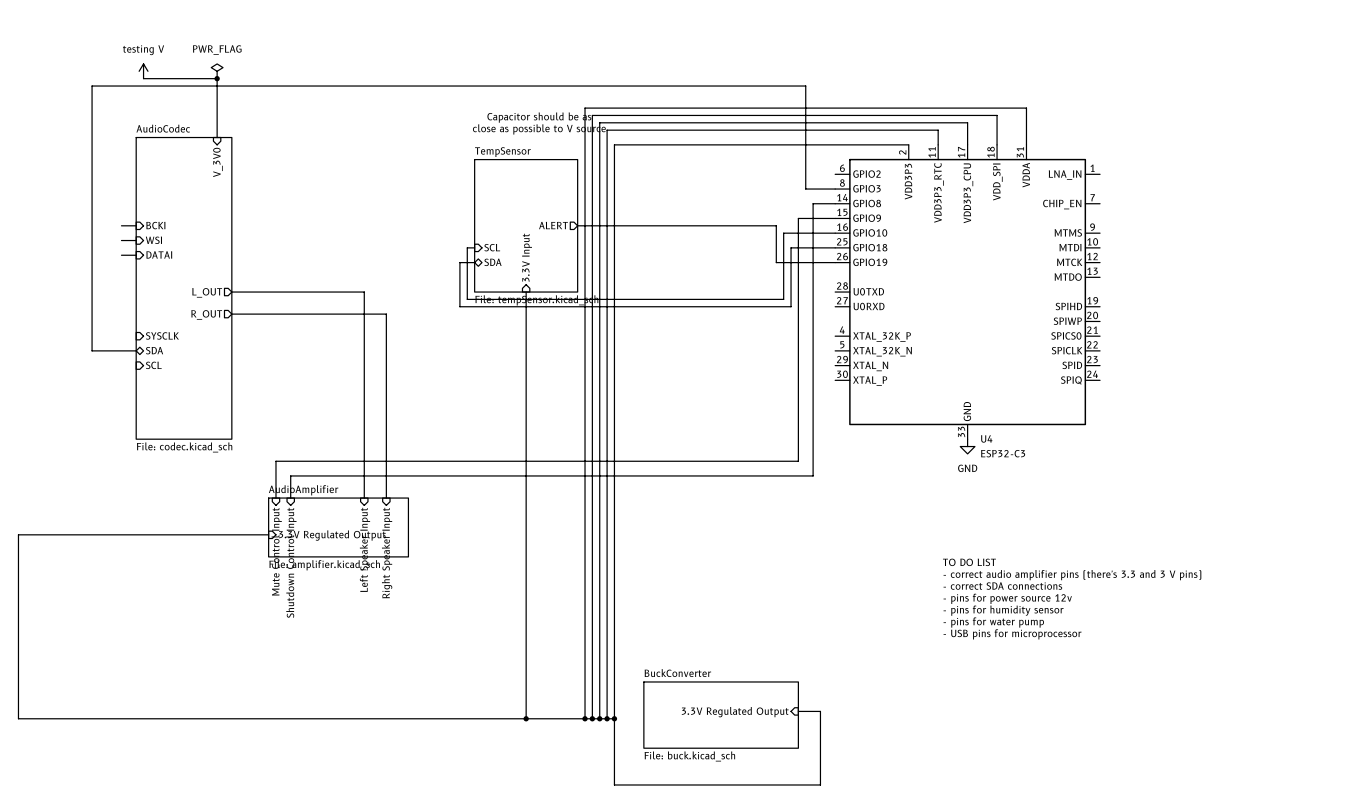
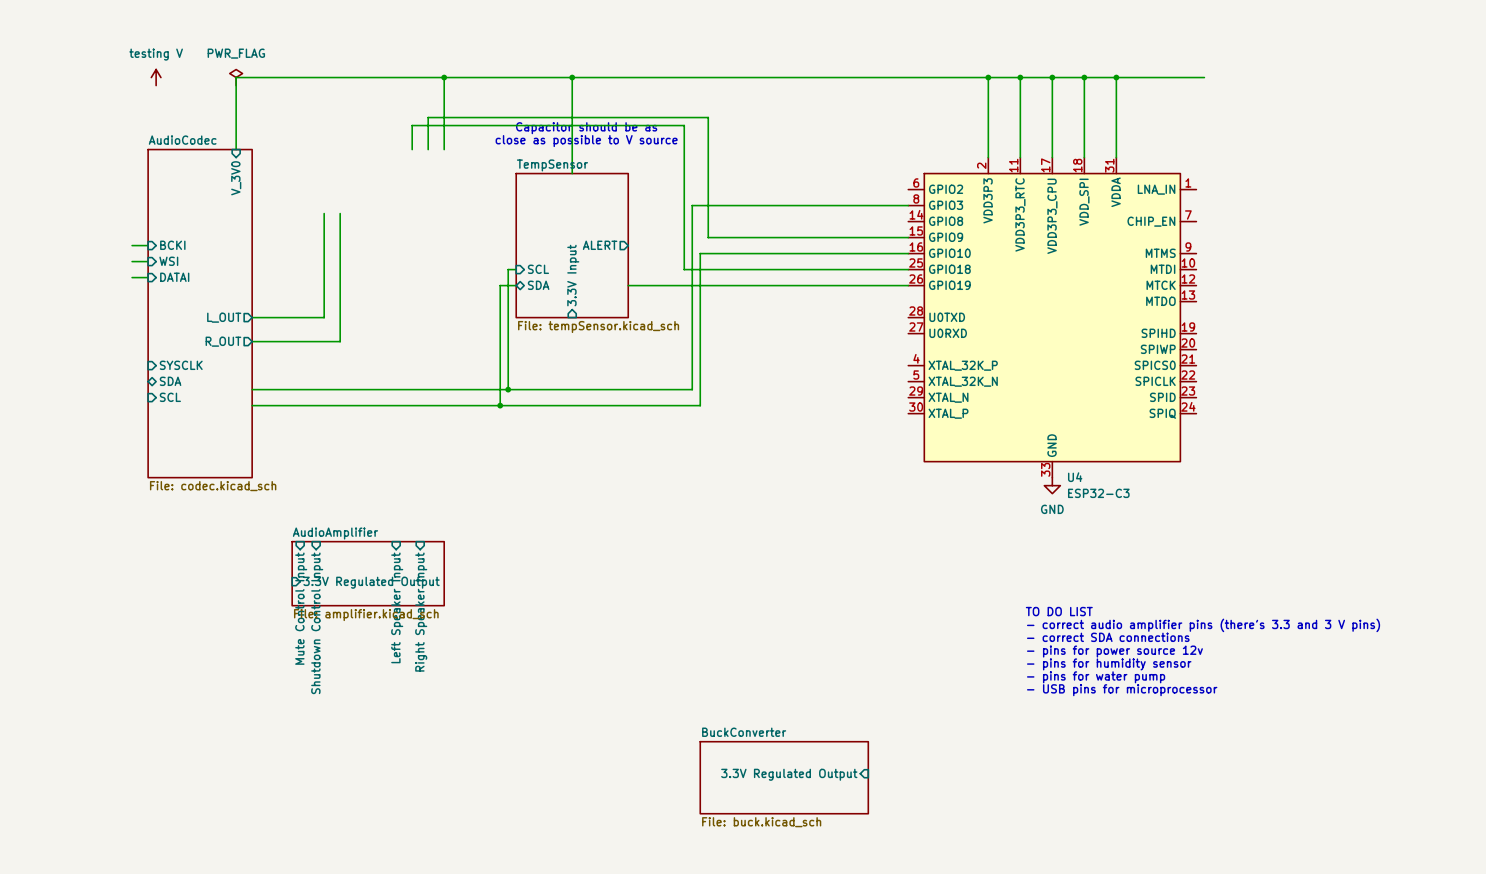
wire: none -> (444, 77) (444, 149)
junction: none -> (444, 77)
wire: none -> (572, 77) (572, 173)
junction: none -> (572, 77)
junction: none -> (988, 77)
junction: none -> (1020, 77)
junction: none -> (1052, 77)
wire: none -> (1084, 77) (1084, 125)
junction: none -> (1084, 77)
wire: none -> (1116, 77) (1116, 117)
junction: none -> (1116, 77)
wire: (143, 78) (217, 78) -> (1204, 77) (236, 77) (236, 85)
junction: (217, 78) -> none
wire: (585, 108) (585, 718) -> (636, 117) (428, 117) (428, 149)
wire: (651, 108) (1026, 108) -> (708, 117) (708, 237) (868, 237)
wire: (592, 115) (592, 718) -> (644, 125) (412, 125) (412, 149)
wire: (629, 115) (997, 115) -> (684, 125) (684, 269) (860, 269)
wire: (967, 122) (599, 122) (599, 718) -> (1052, 133) (1052, 77)
wire: (938, 130) (607, 130) (607, 718) -> (1020, 141) (1020, 77)
wire: (908, 144) (614, 144) (614, 784) (820, 784) (820, 711) (798, 711) -> (988, 157) (988, 77)
wire: (805, 189) (805, 86) (92, 86) (92, 350) (136, 350) -> (876, 205) (692, 205) (692, 389) (252, 389)
wire: (835, 203) (813, 203) (813, 475) (290, 475) (290, 498) -> none
wire: (798, 218) (798, 461) (275, 461) (275, 498) -> none
wire: (577, 225) (776, 225) (776, 262) -> (628, 285) (844, 285)
wire: (783, 233) (783, 299) (467, 299) -> (852, 253) (700, 253) (700, 405) (252, 405)
wire: (791, 247) (791, 306) (459, 306) -> (500, 405) (500, 333)
wire: (298, 292) (364, 292) (364, 498) -> (324, 317) (324, 213)
wire: (526, 292) (526, 718) -> none
wire: none -> (508, 325) (508, 389)
wire: (312, 314) (386, 314) (386, 498) -> (340, 341) (340, 213)
junction: none -> (508, 389)
junction: none -> (500, 405)
wire: (268, 534) (18, 534) (18, 718) (614, 718) -> none
junction: (526, 718) -> none
junction: (585, 718) -> none
junction: (592, 718) -> none
junction: (599, 718) -> none
junction: (607, 718) -> none
junction: (614, 718) -> none

